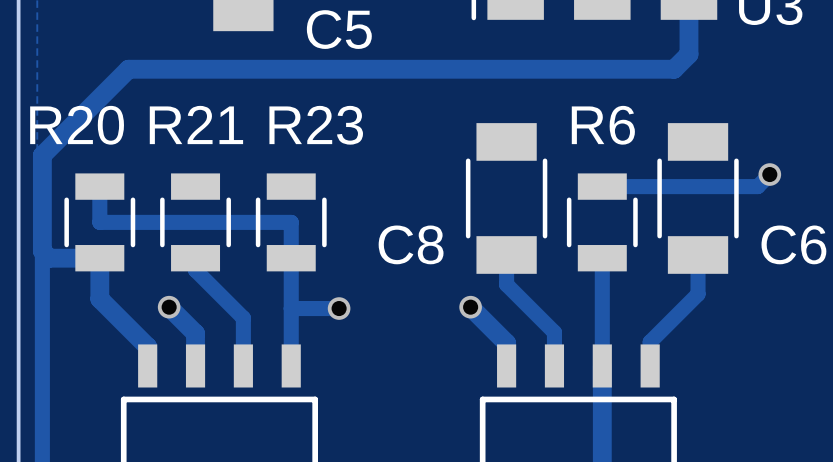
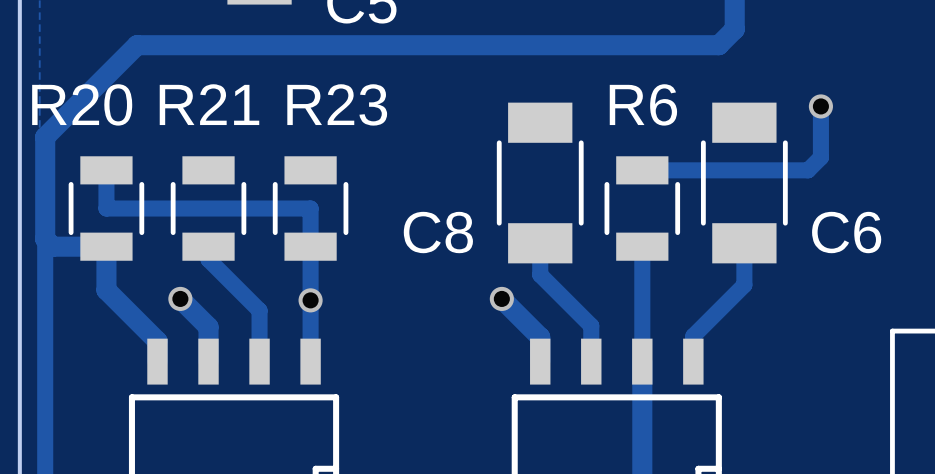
track: none -> (820, 106) (820, 157)
via position: (769, 174) -> (820, 106)
track: (291, 308) (339, 308) -> none
via position: (339, 308) -> (310, 300)

